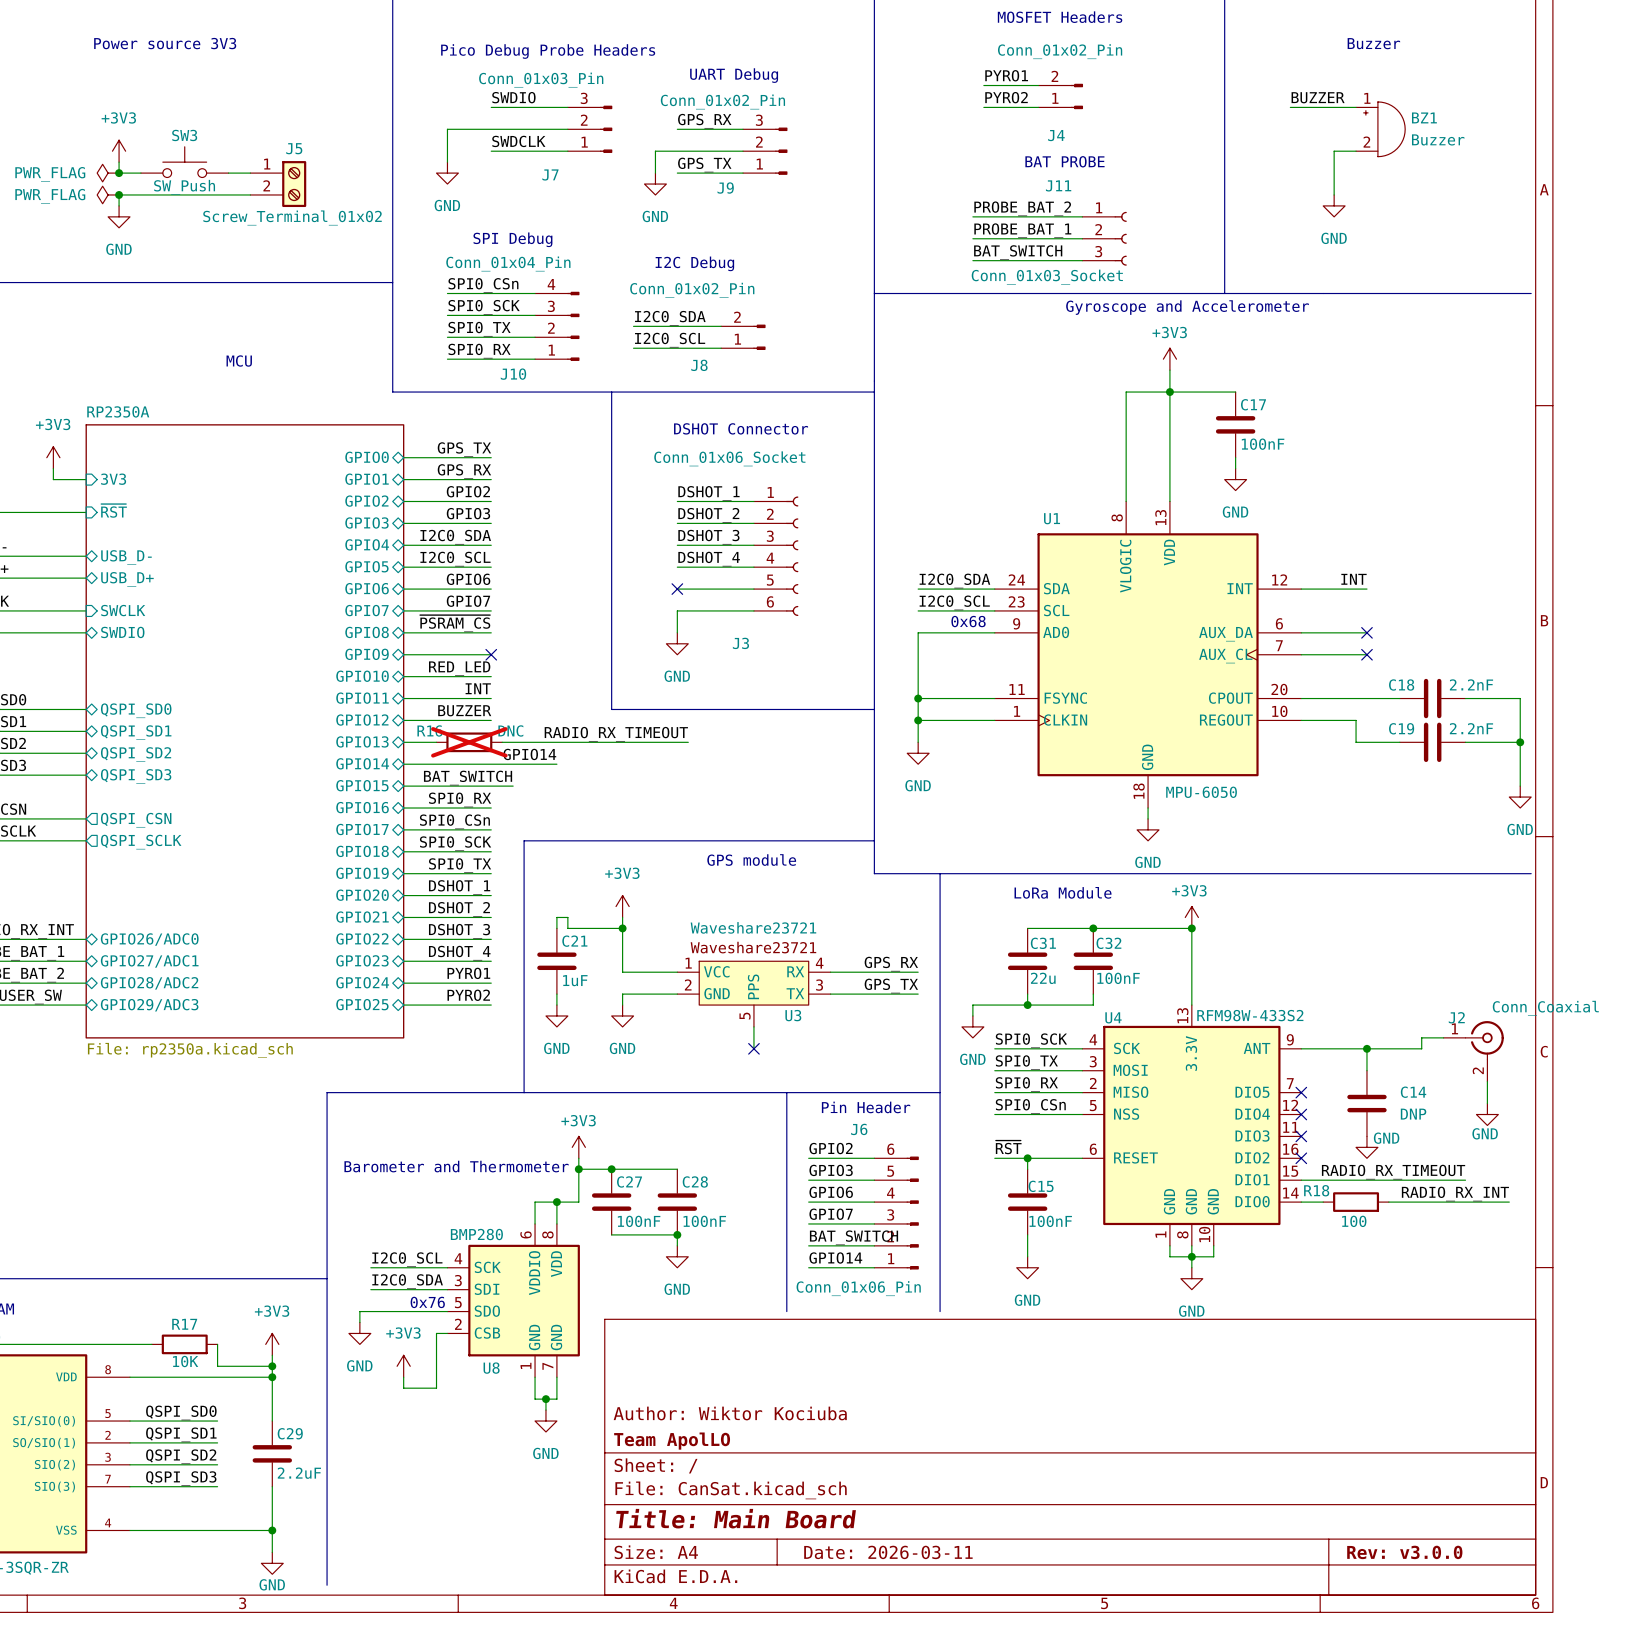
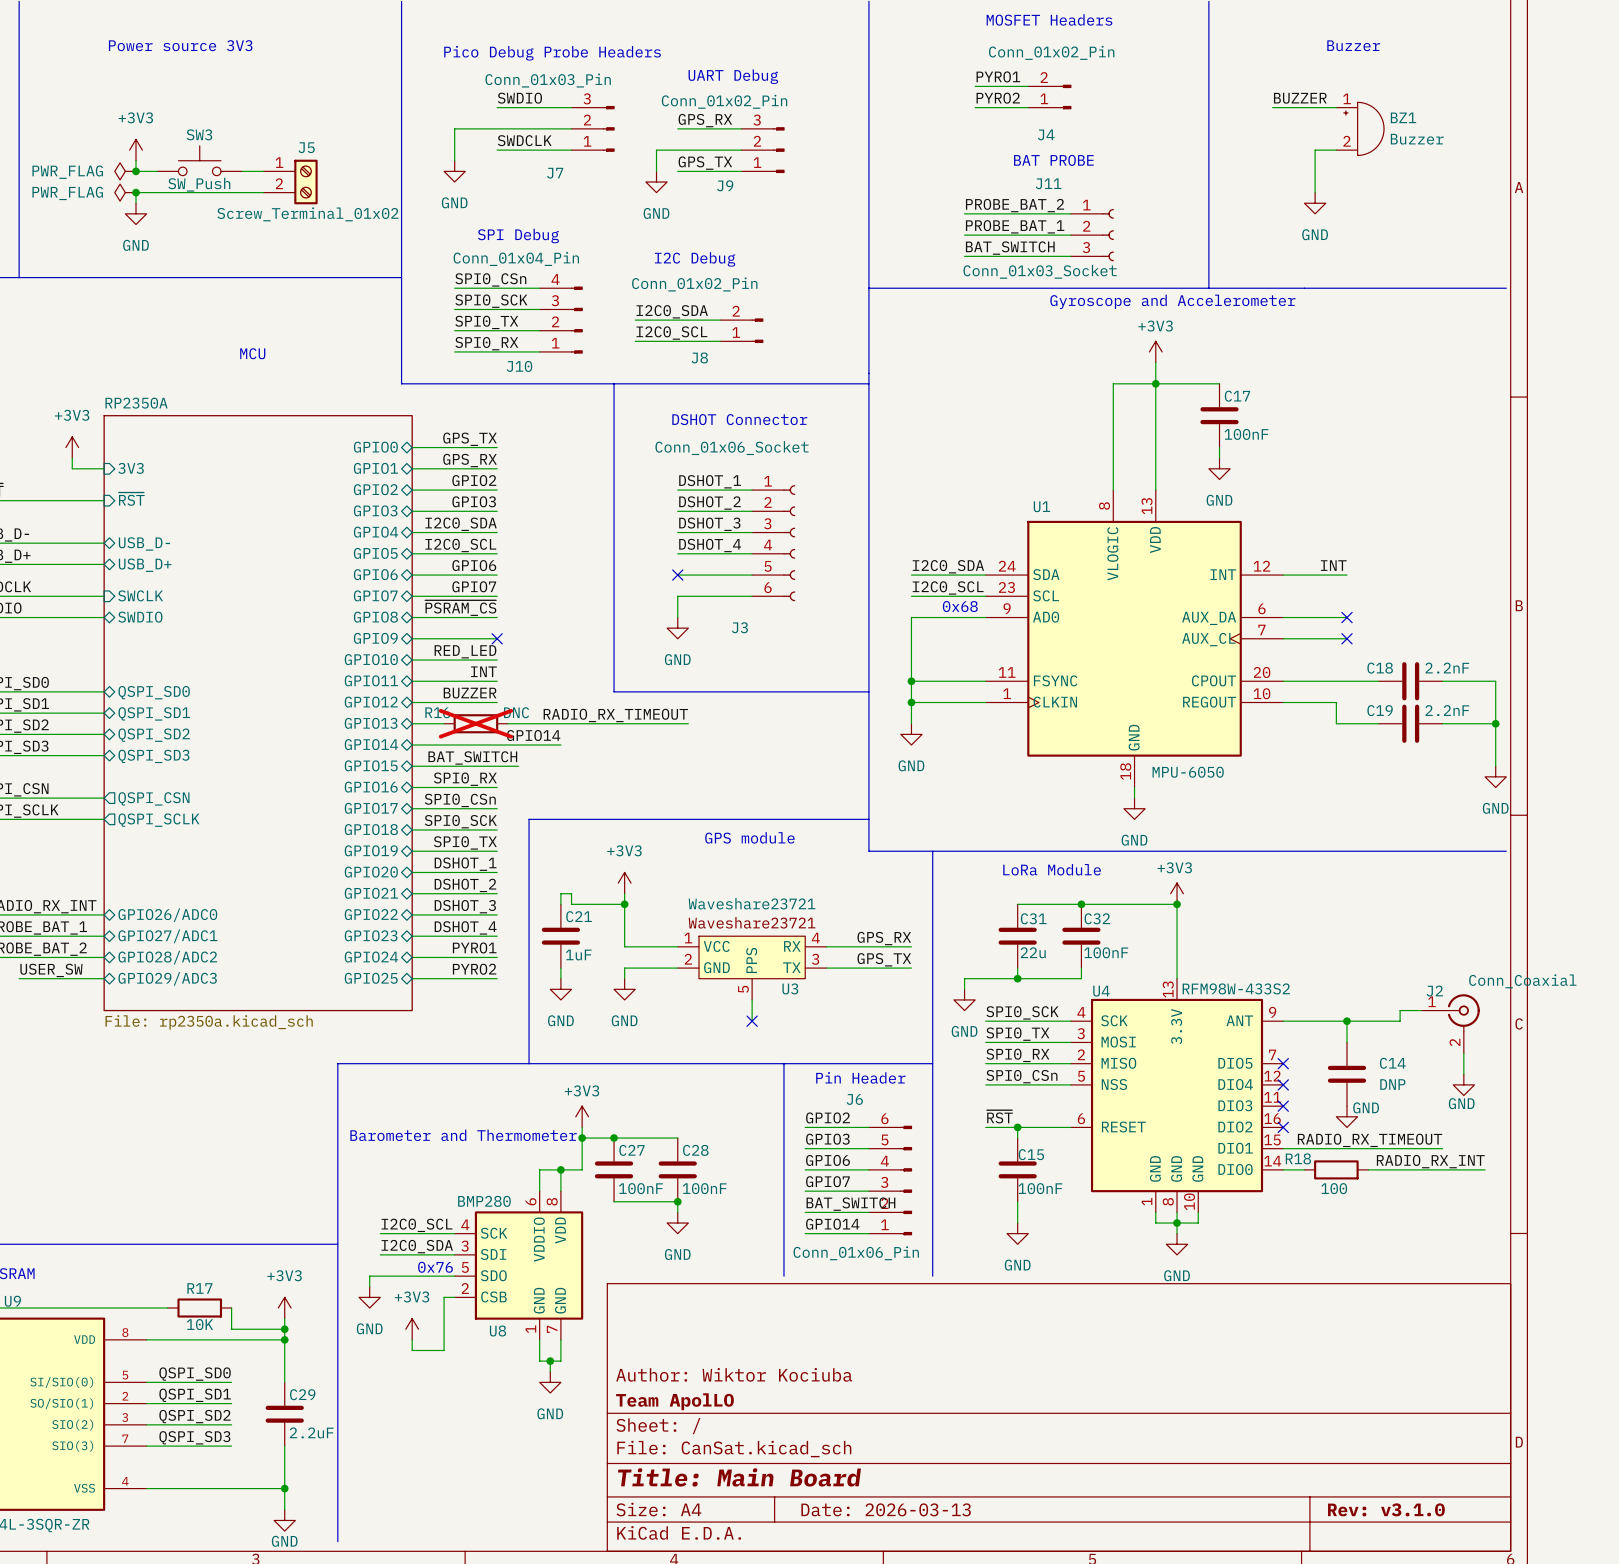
title block: Date: 2026-03-11 (888, 1552) -> Date: 2026-03-13 (886, 1509)
title block: Rev: v3.0.0 (1404, 1552) -> Rev: v3.1.0 (1386, 1509)

